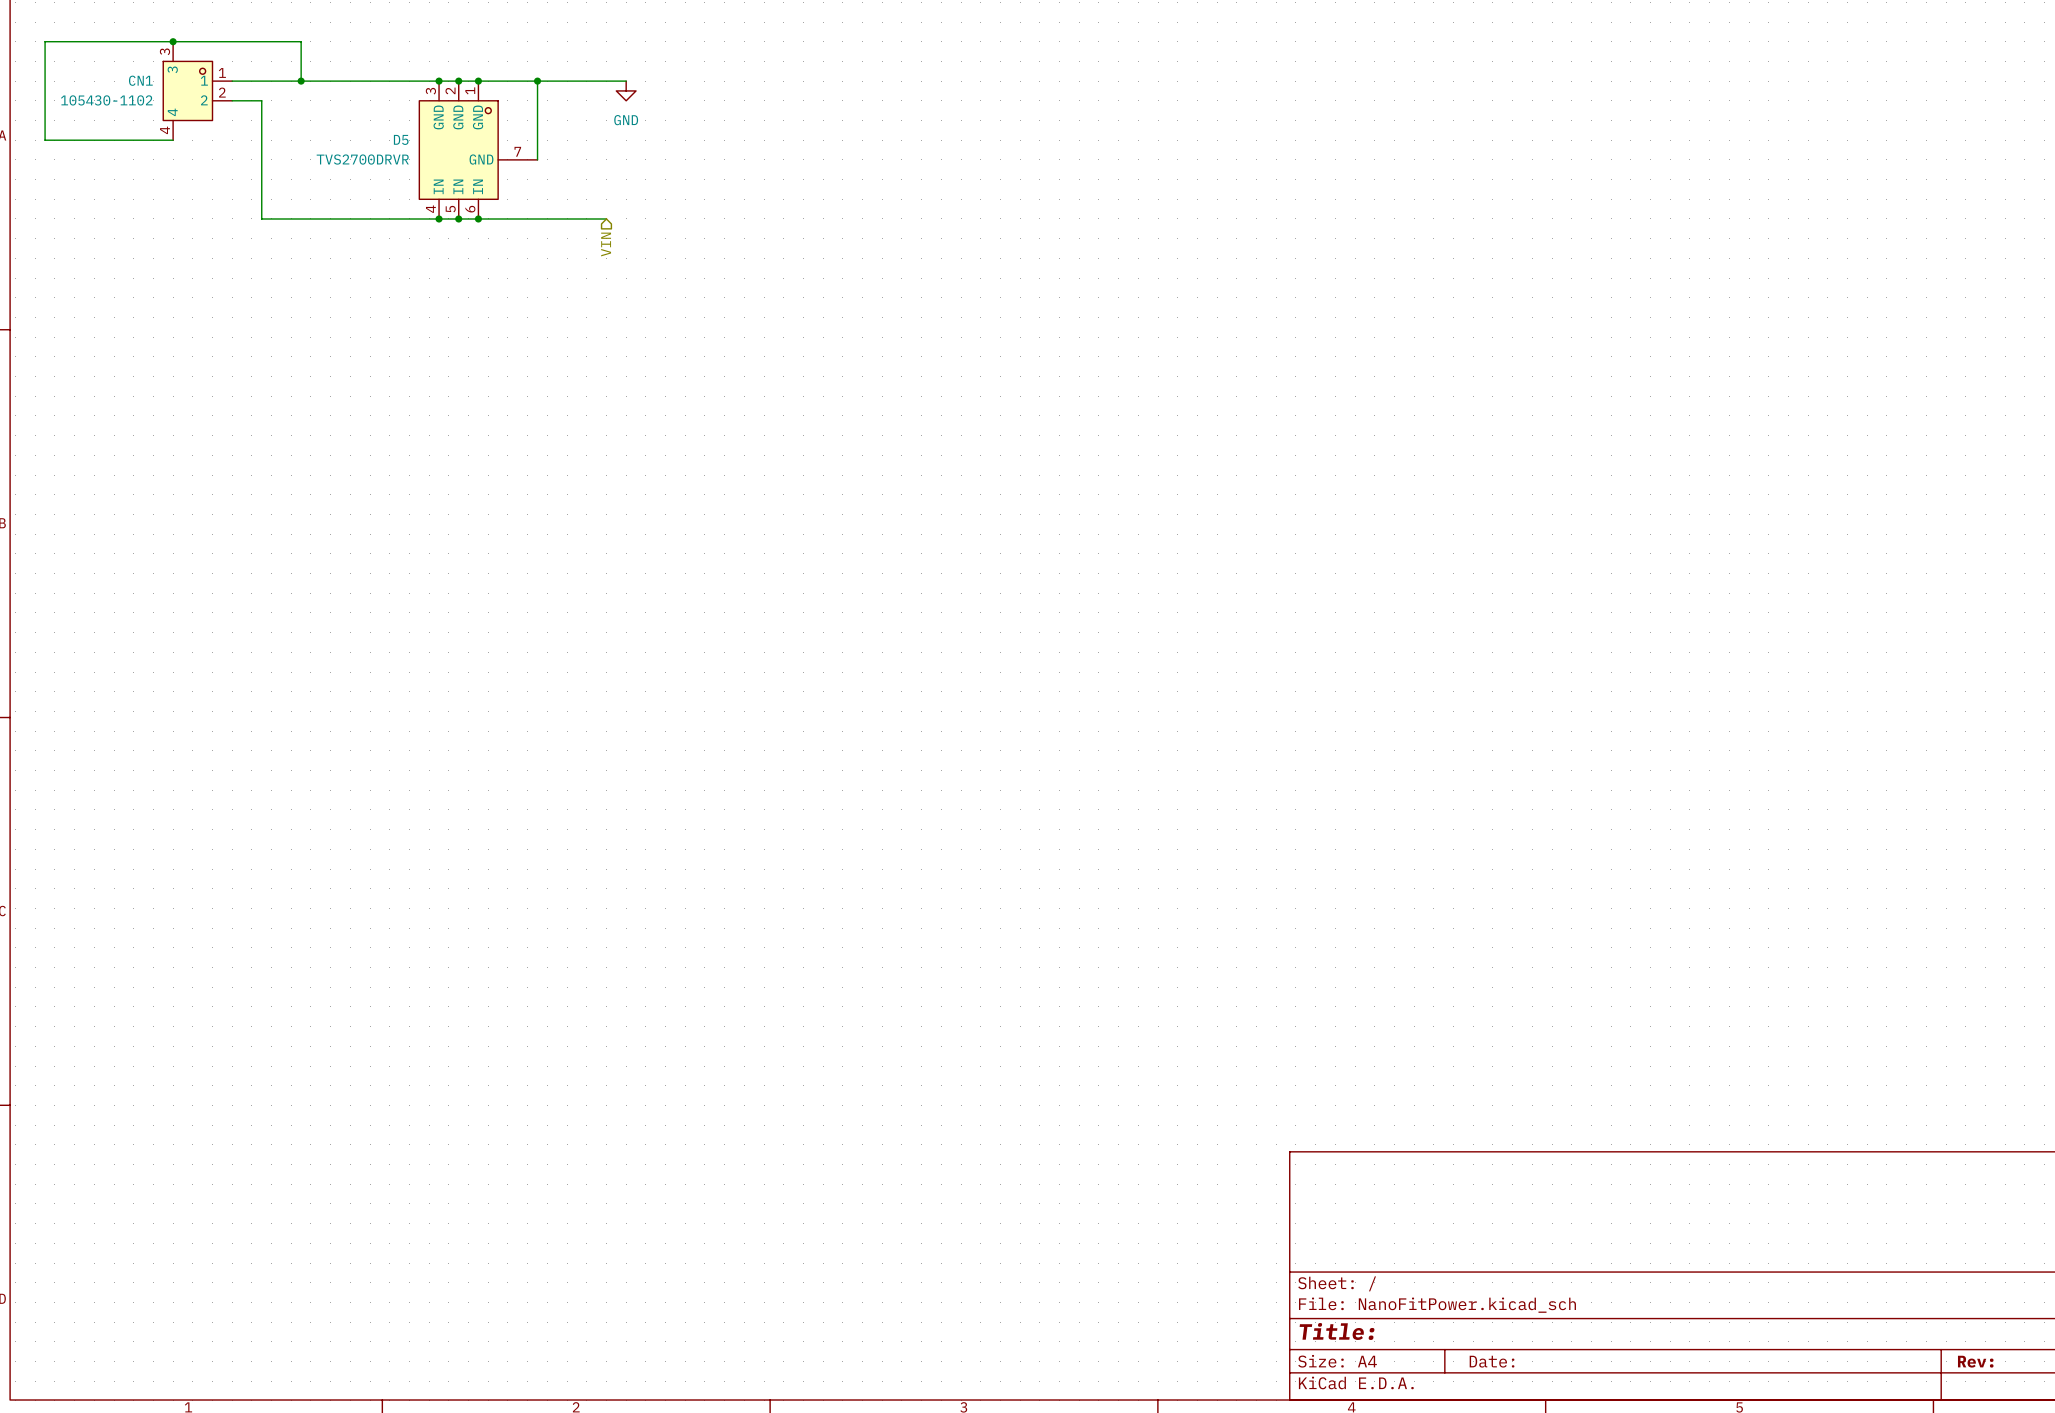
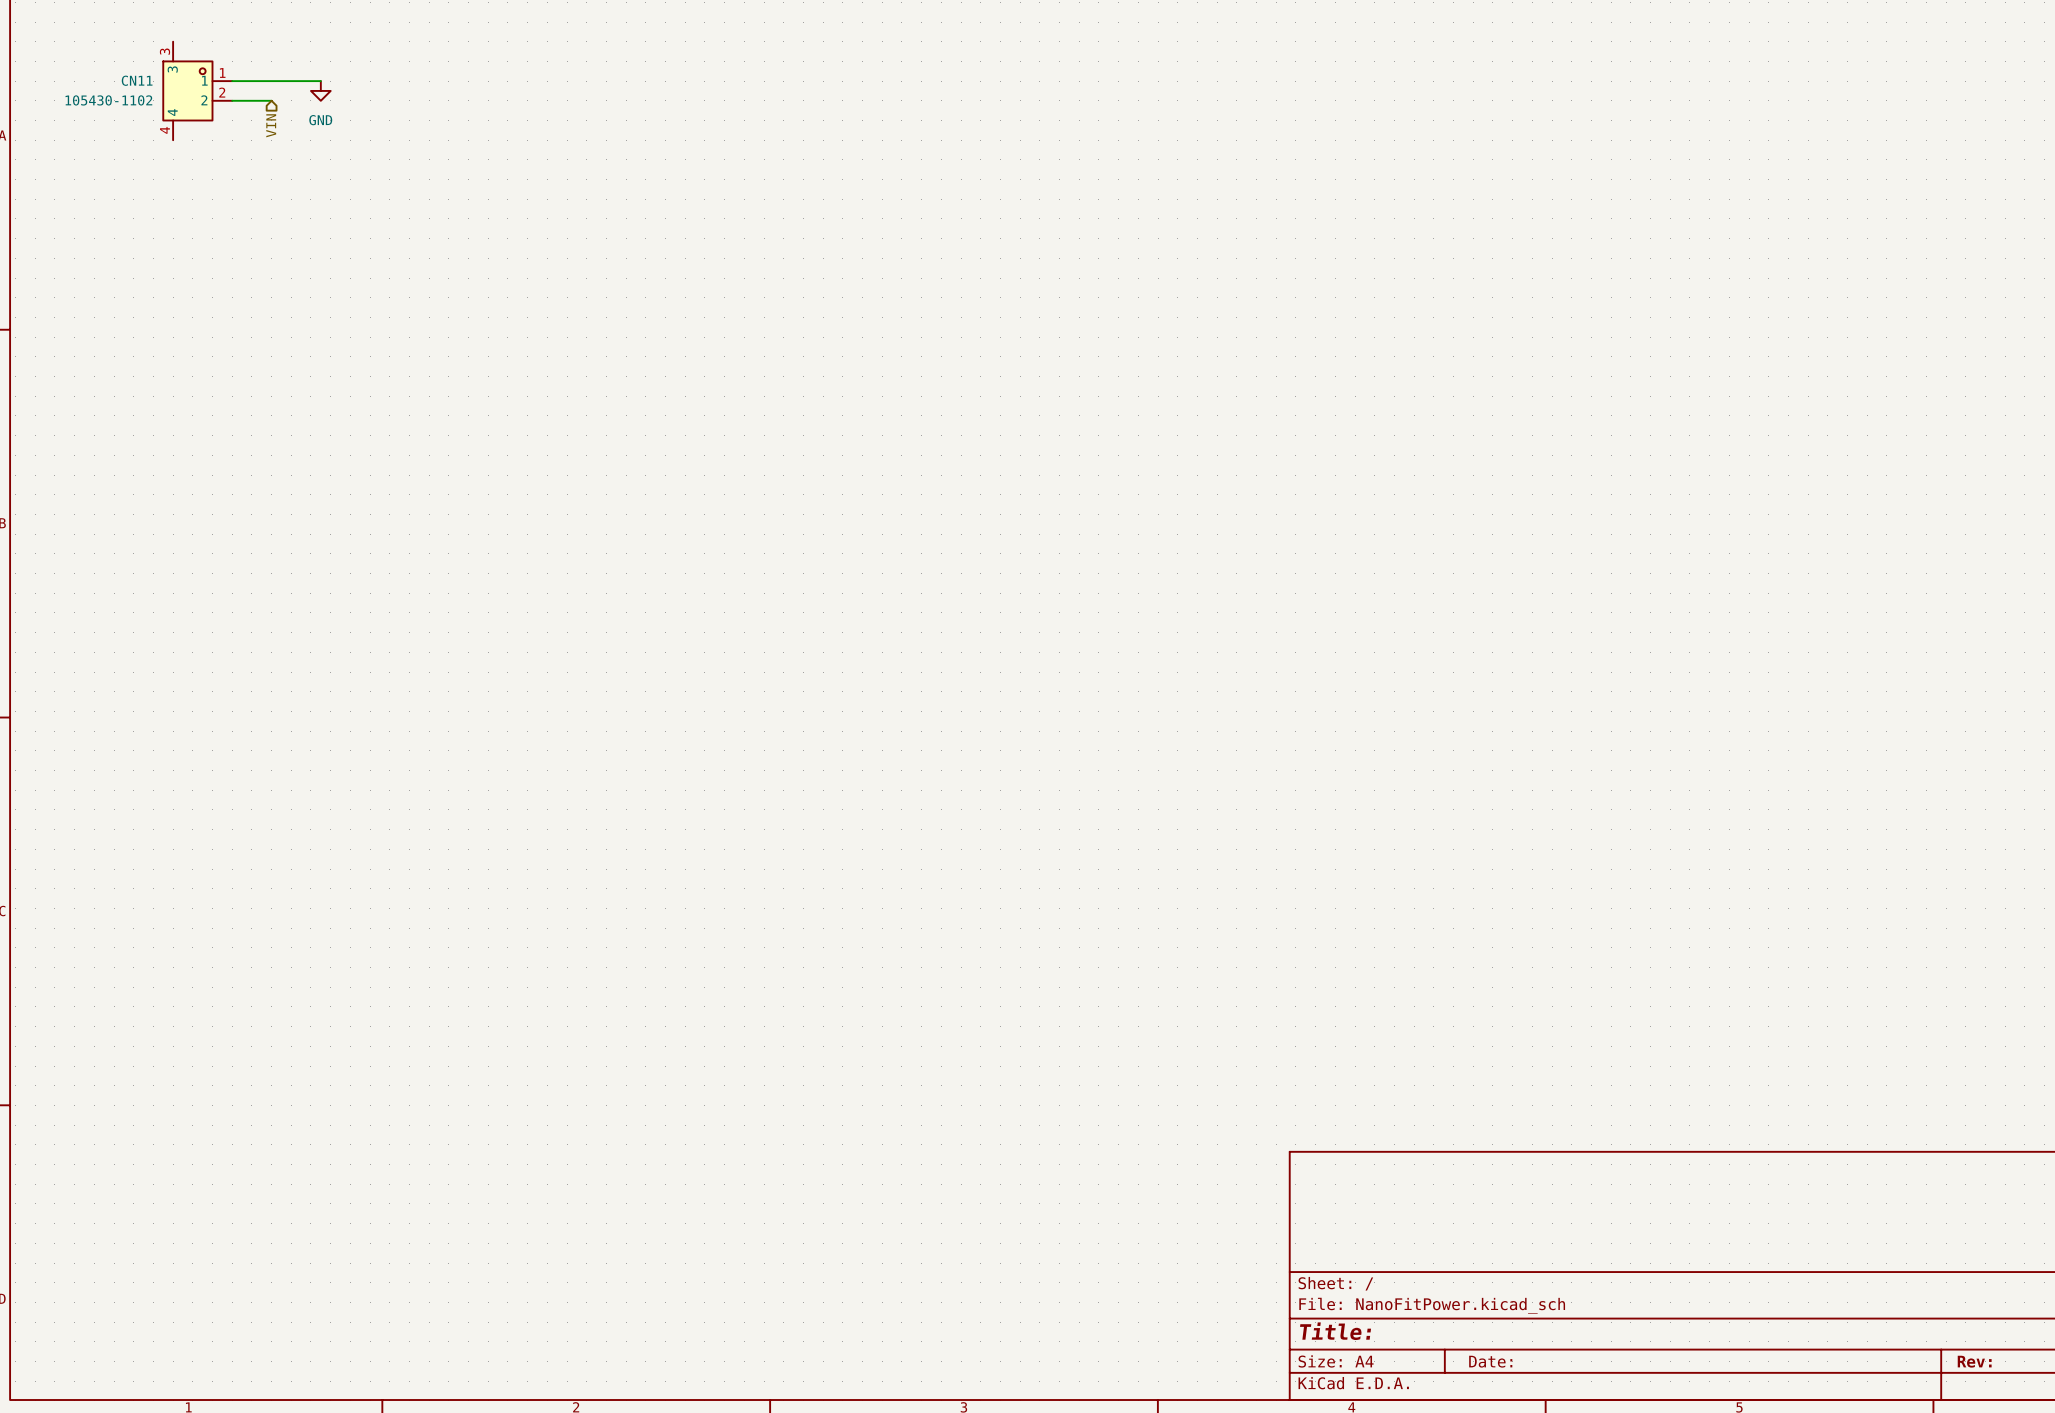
junction: (173, 41) -> none
CN1 name: CN1 (140, 80) -> CN11 (137, 80)
wire: (301, 81) (301, 41) (45, 41) (45, 140) (173, 140) -> none
junction: (301, 81) -> none
wire: (320, 81) (626, 81) -> none
junction: (439, 81) -> none
junction: (458, 81) -> none
junction: (478, 81) -> none
wire: (537, 81) (537, 159) -> none
junction: (537, 81) -> none
power symbol: none -> GND (320, 90)
power symbol: GND (626, 90) -> none
wire: (261, 100) (261, 218) (606, 218) -> (261, 100) (271, 100)
hierarchical label: none -> VIN (271, 125)
D5: TVS2700DRVR (478, 150) -> none
junction: (439, 218) -> none
junction: (458, 218) -> none
junction: (478, 218) -> none
hierarchical label: VIN (606, 244) -> none

